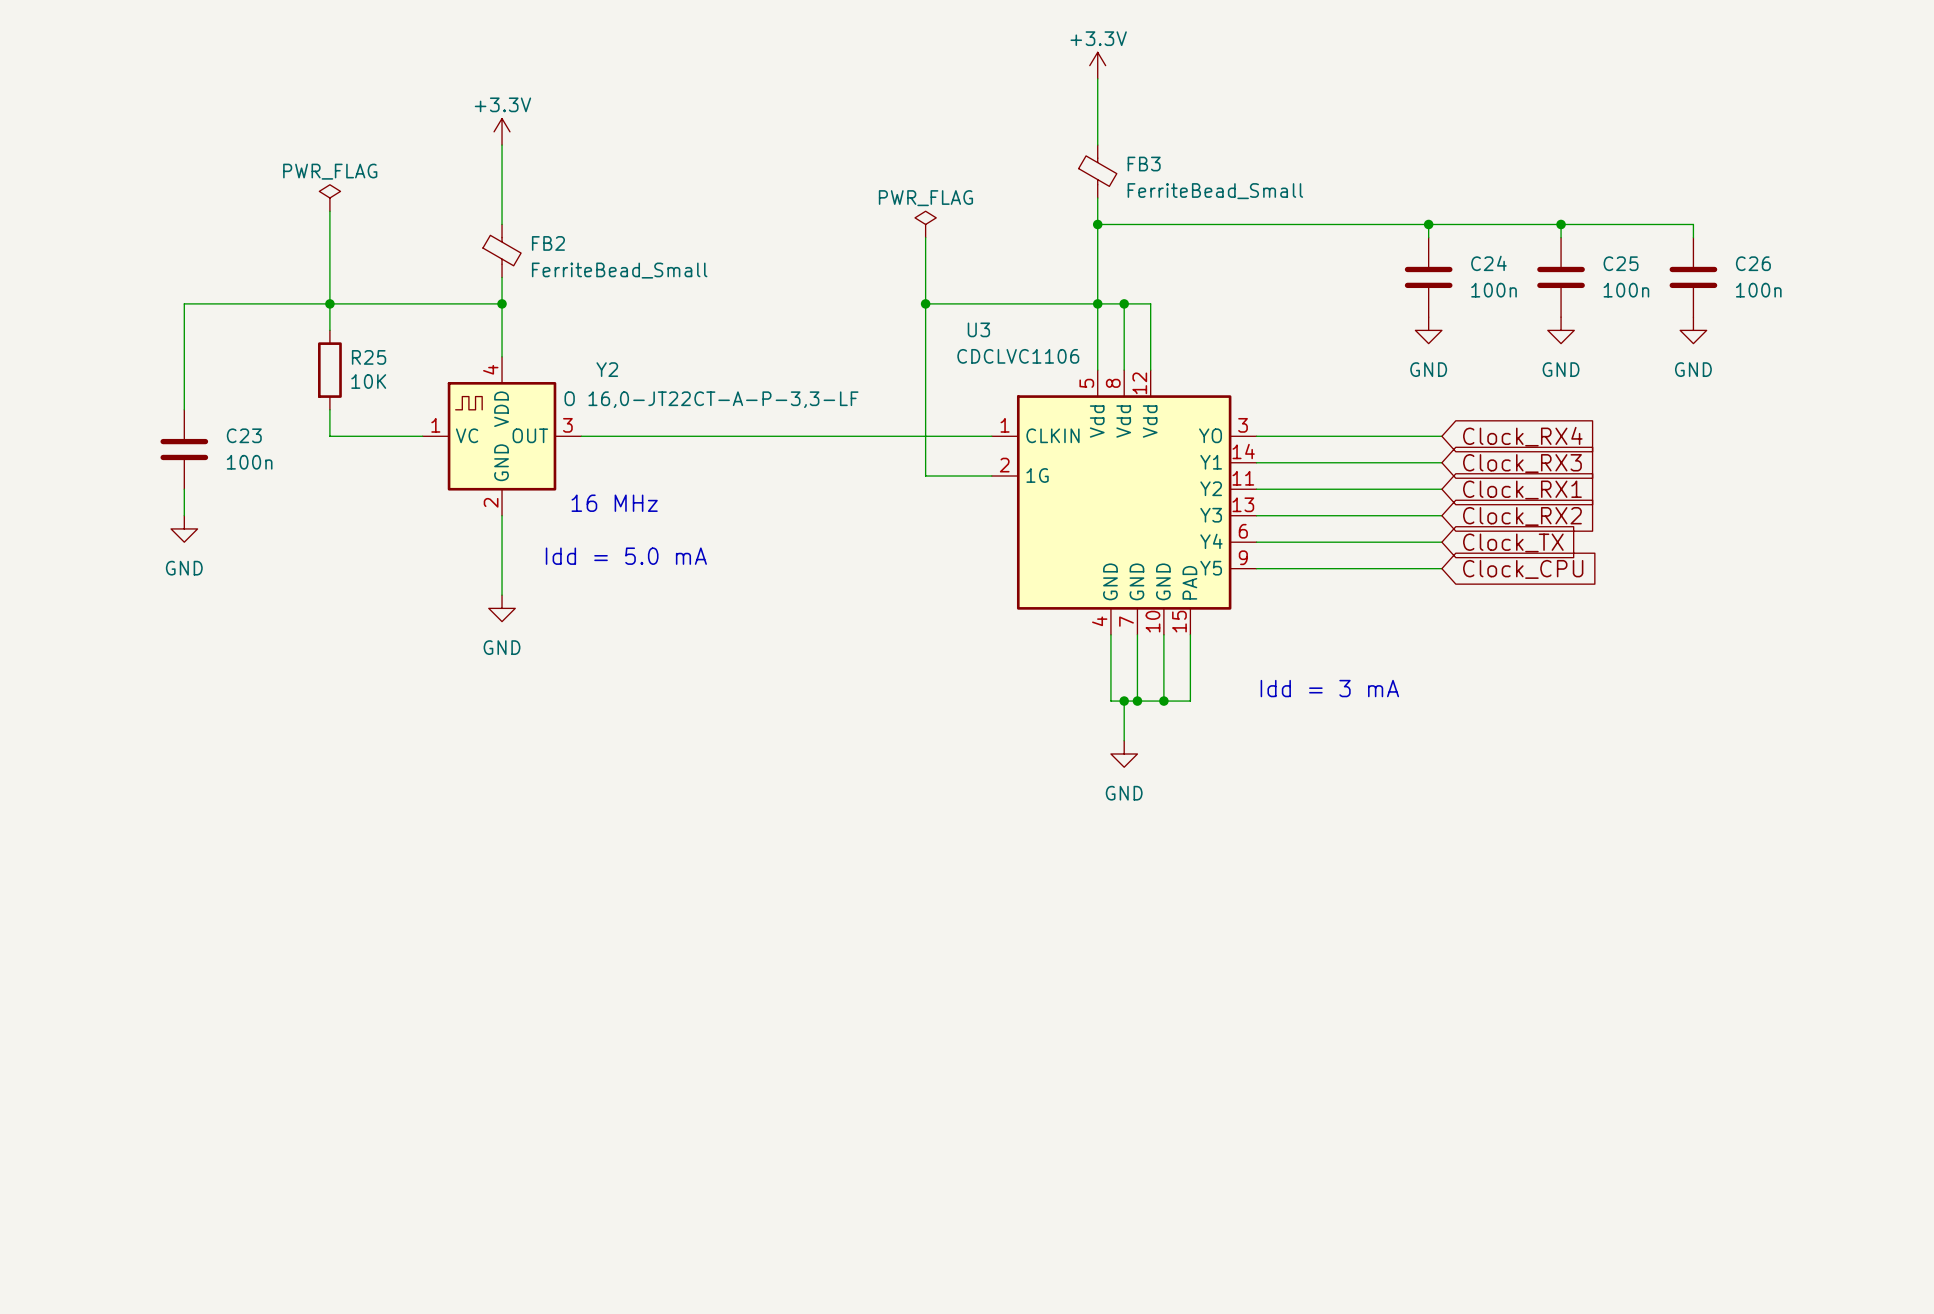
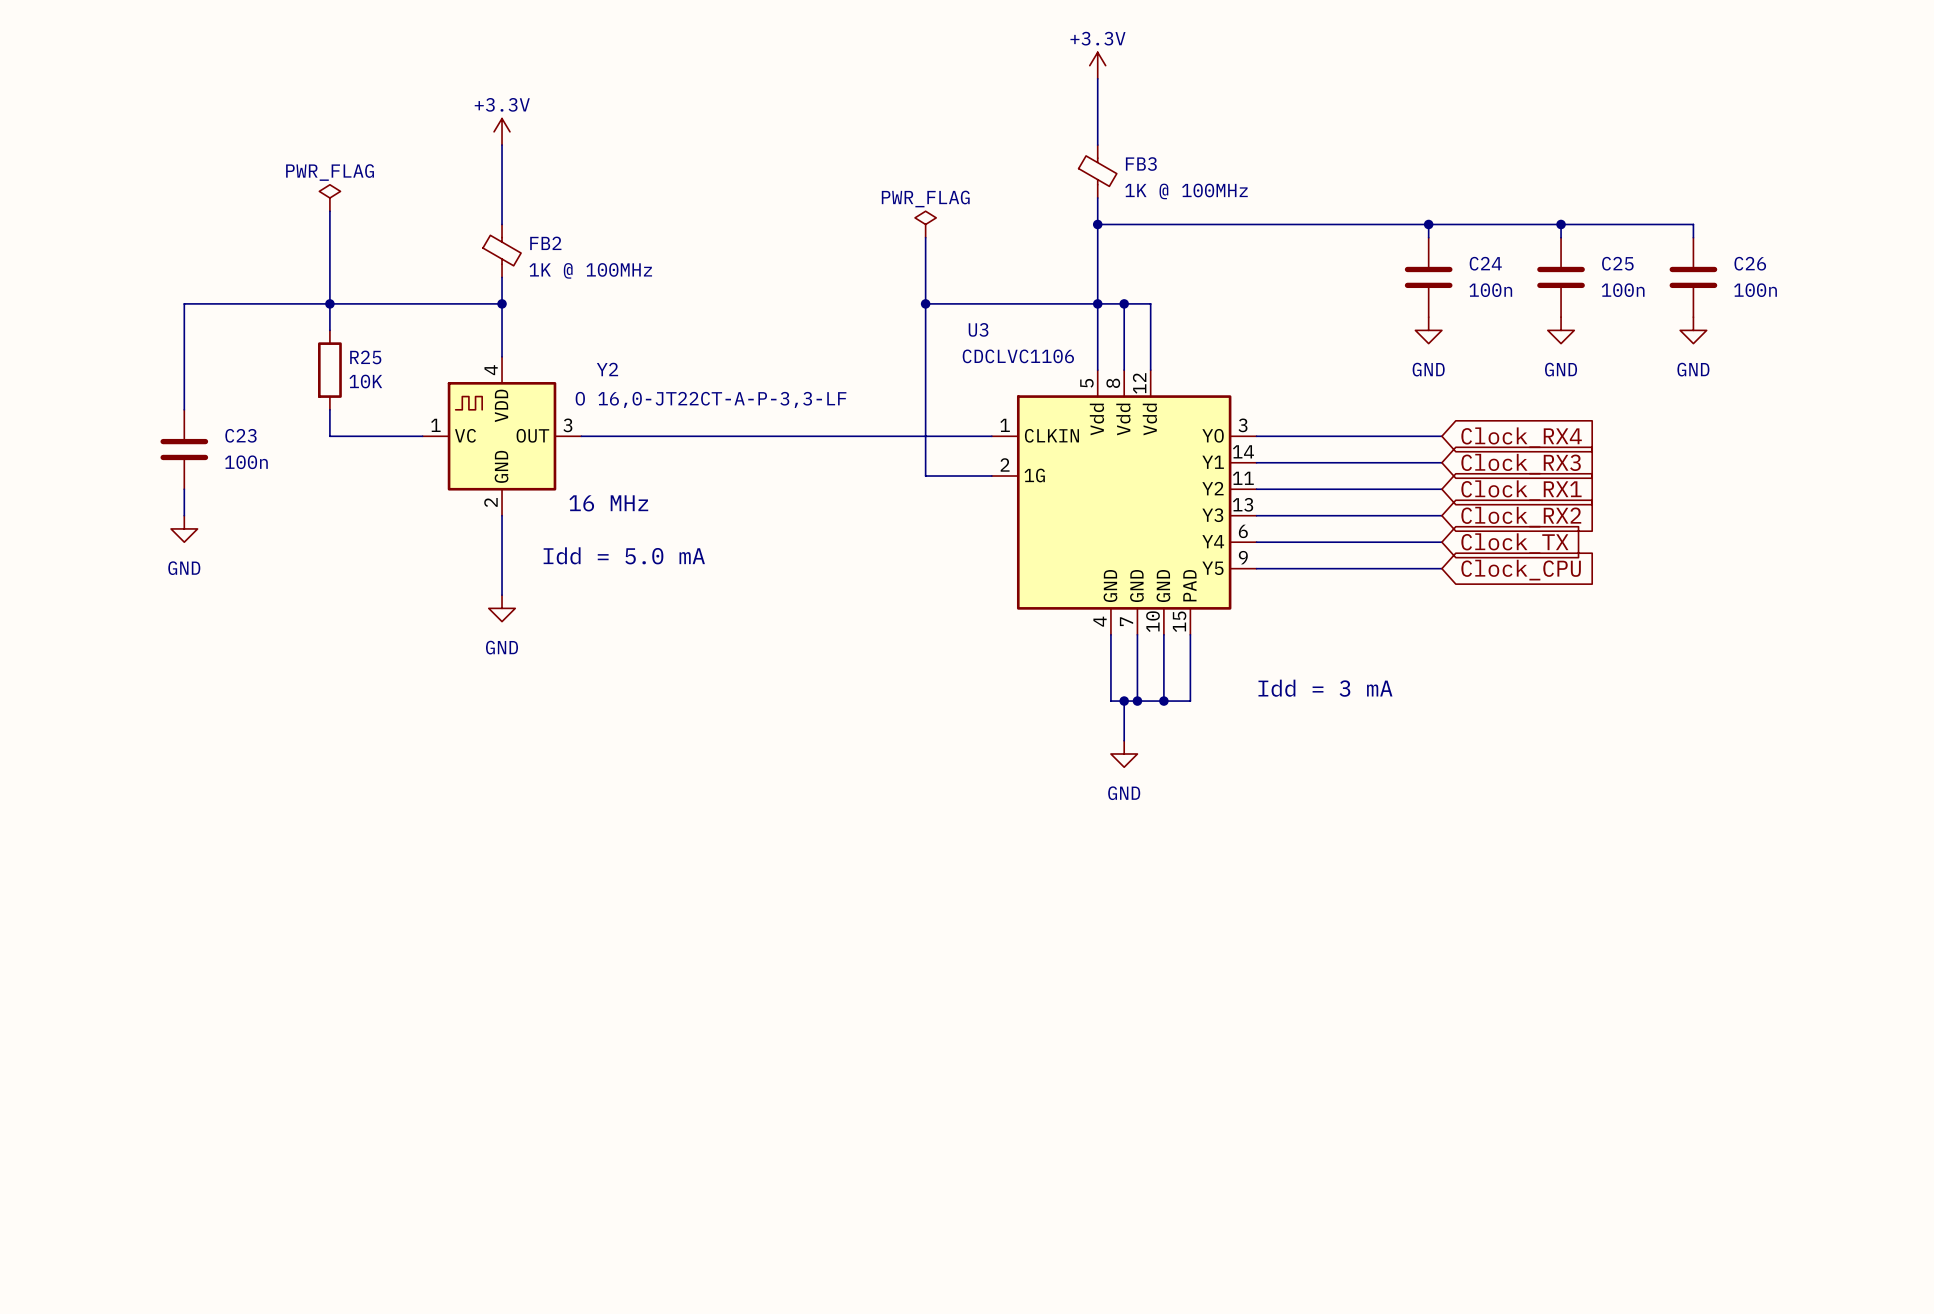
FB3 value: FerriteBead_Small (1215, 191) -> 1K @ 100MHz (1186, 191)
FB2 value: FerriteBead_Small (619, 270) -> 1K @ 100MHz (590, 270)

